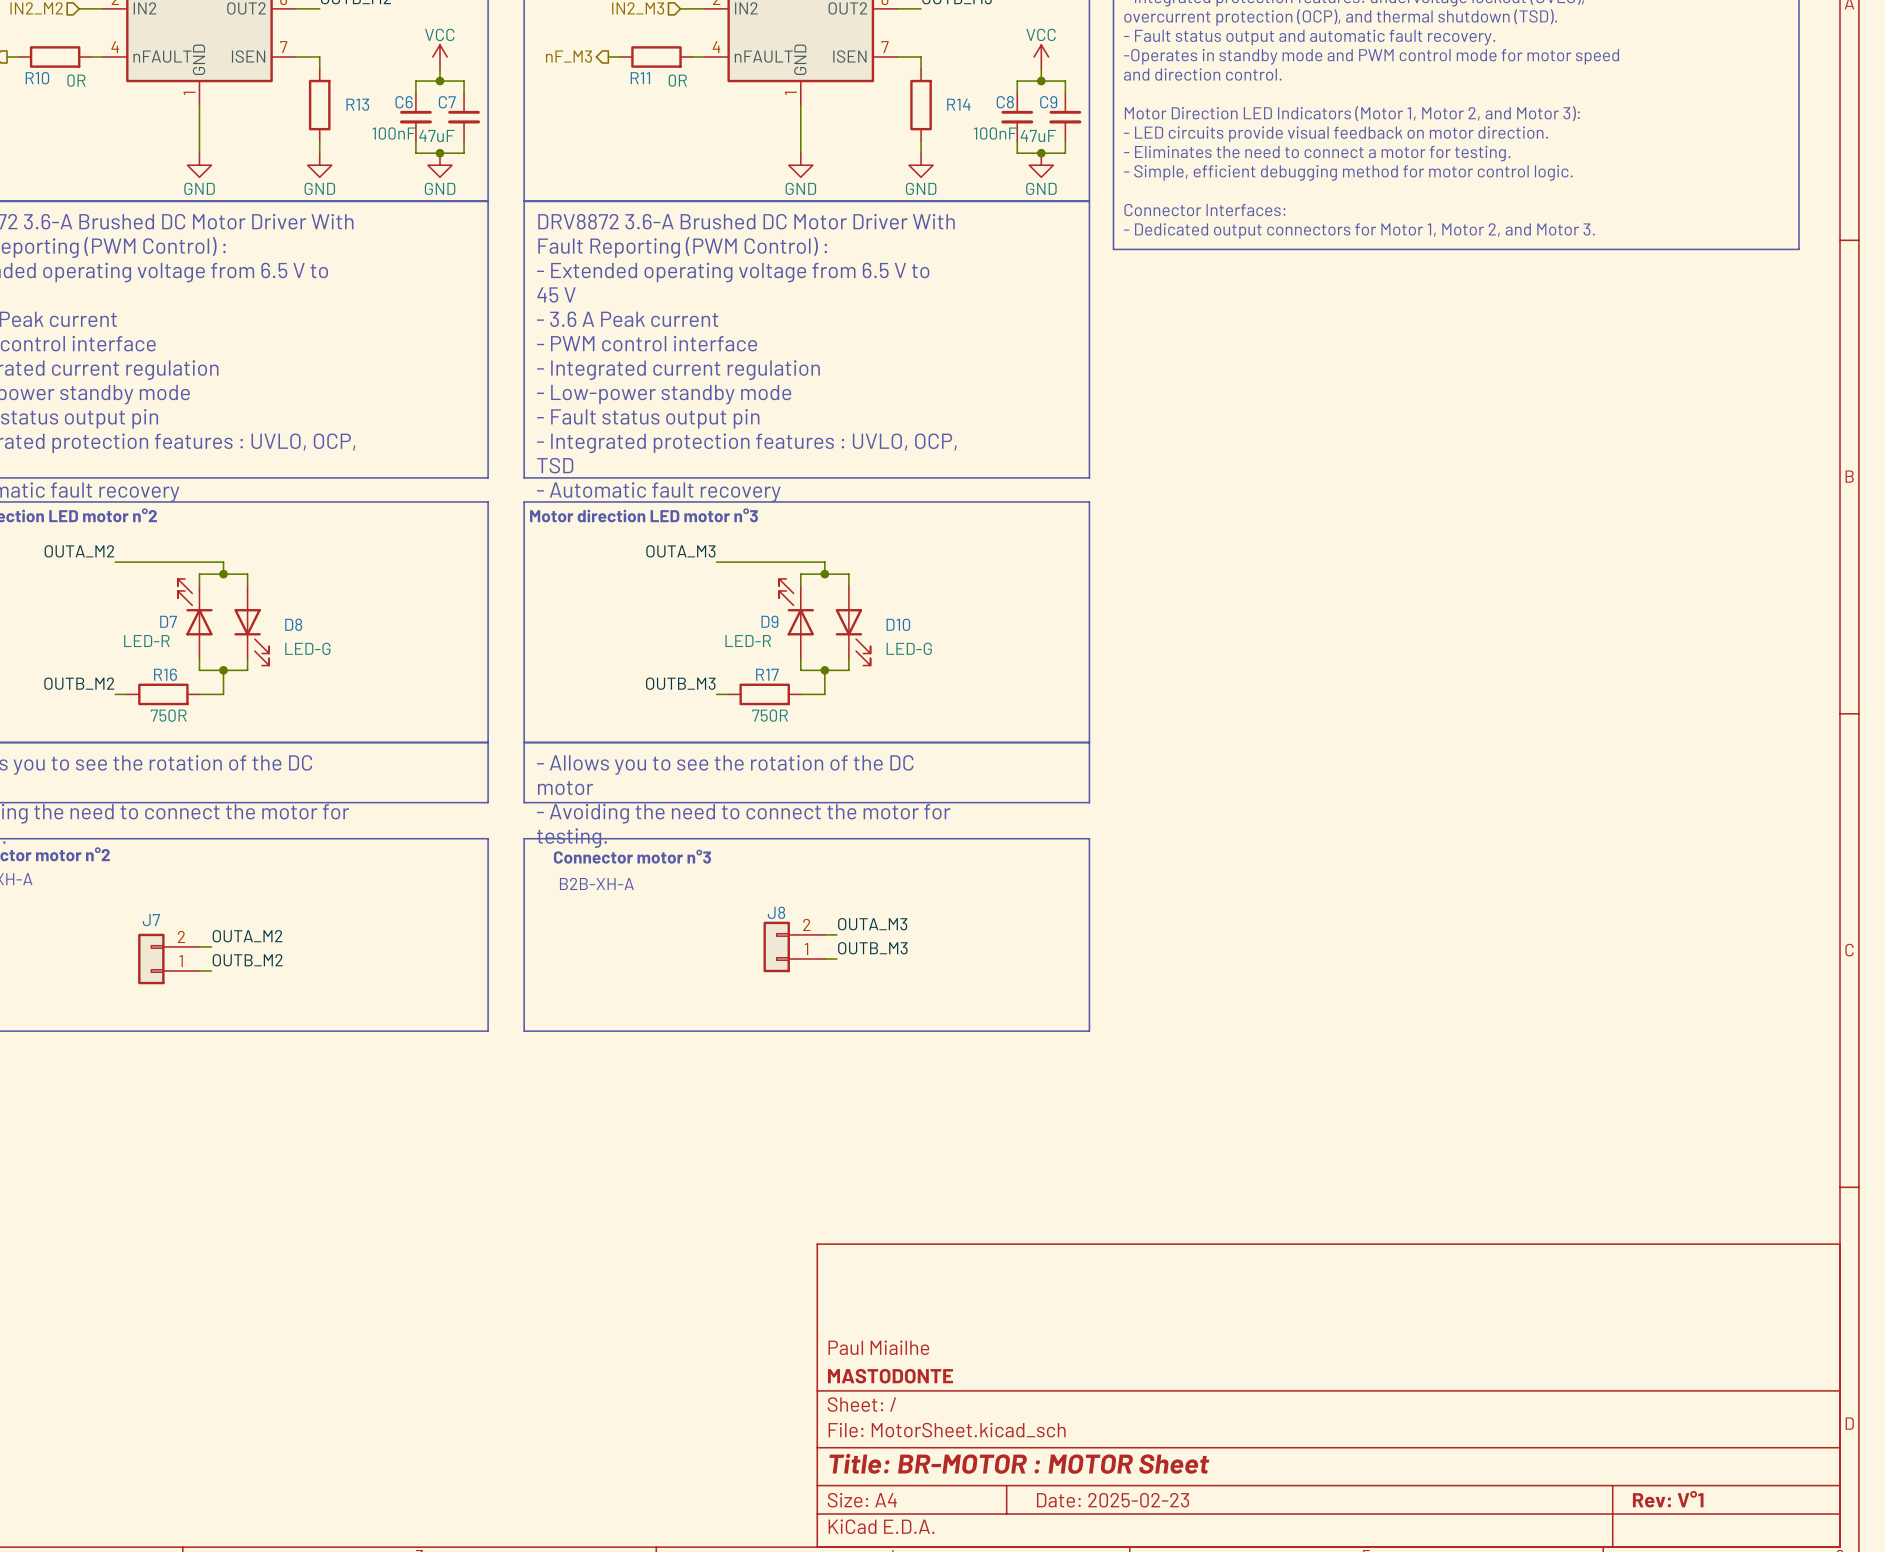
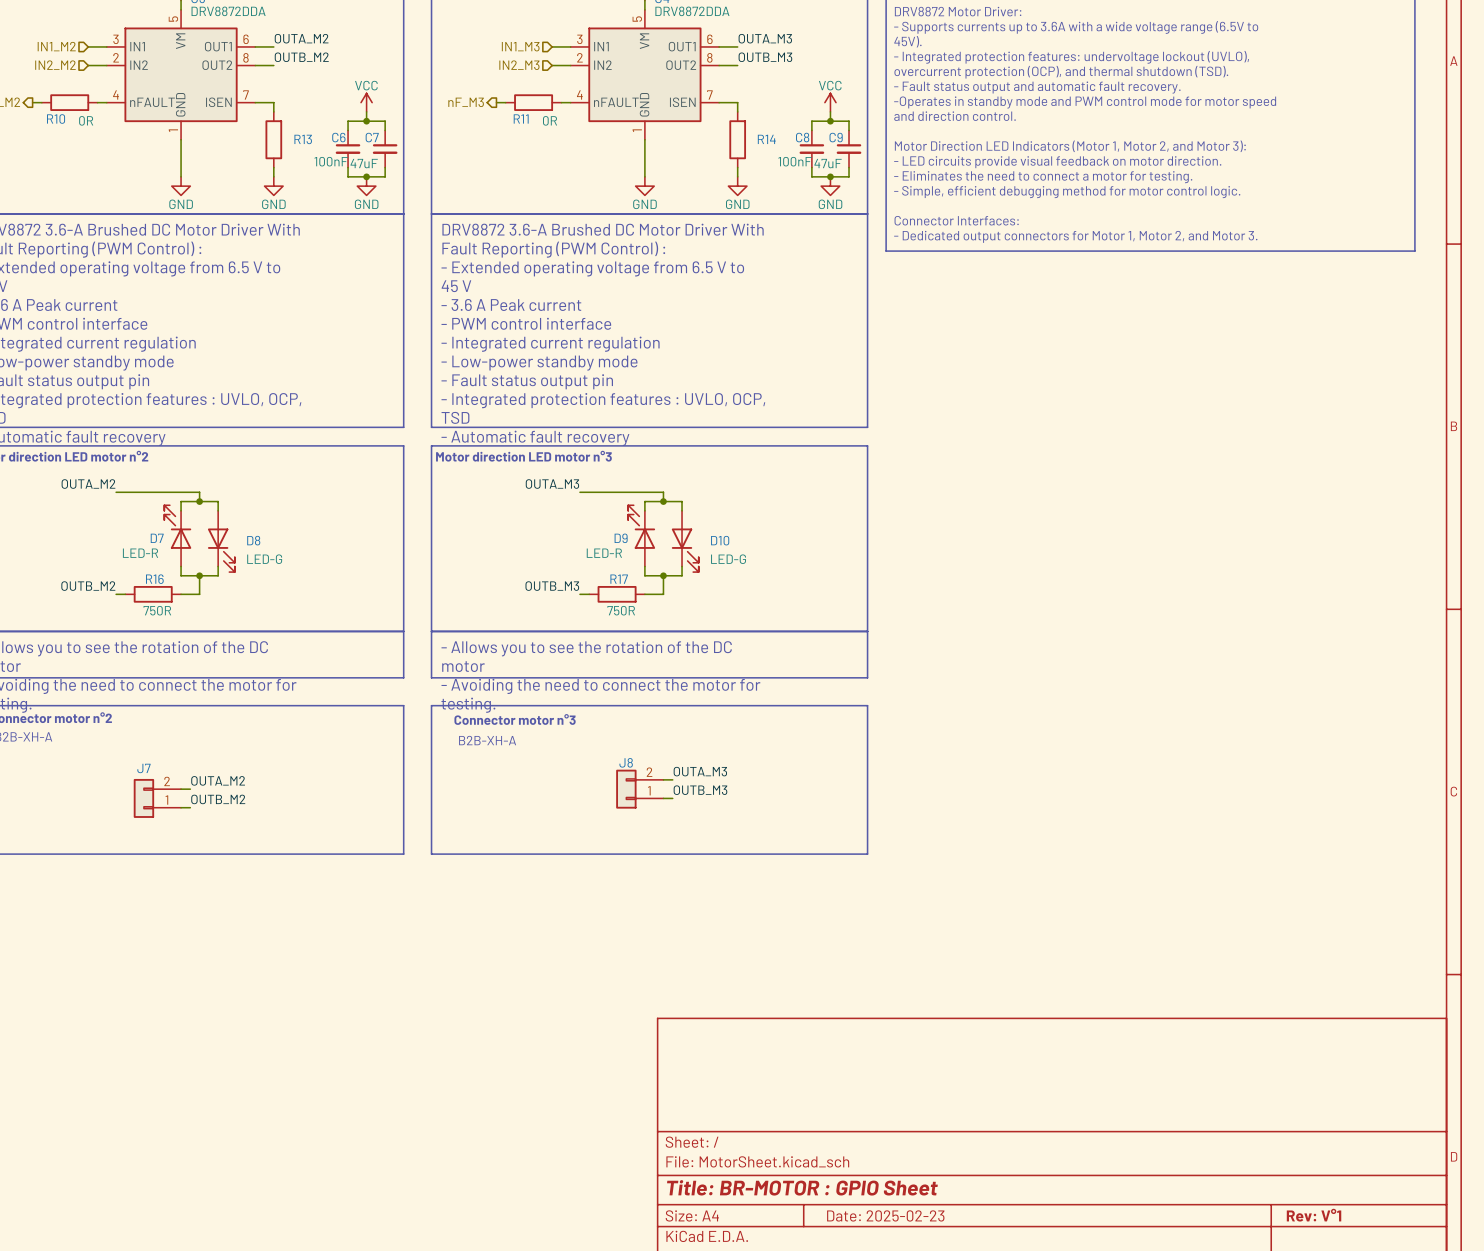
title block: Paul Miailhe (878, 1347) -> none
title block: MASTODONTE (890, 1376) -> none
title block: Title: BR-MOTOR : MOTOR Sheet (1019, 1463) -> Title: BR-MOTOR : GPIO Sheet (802, 1187)

